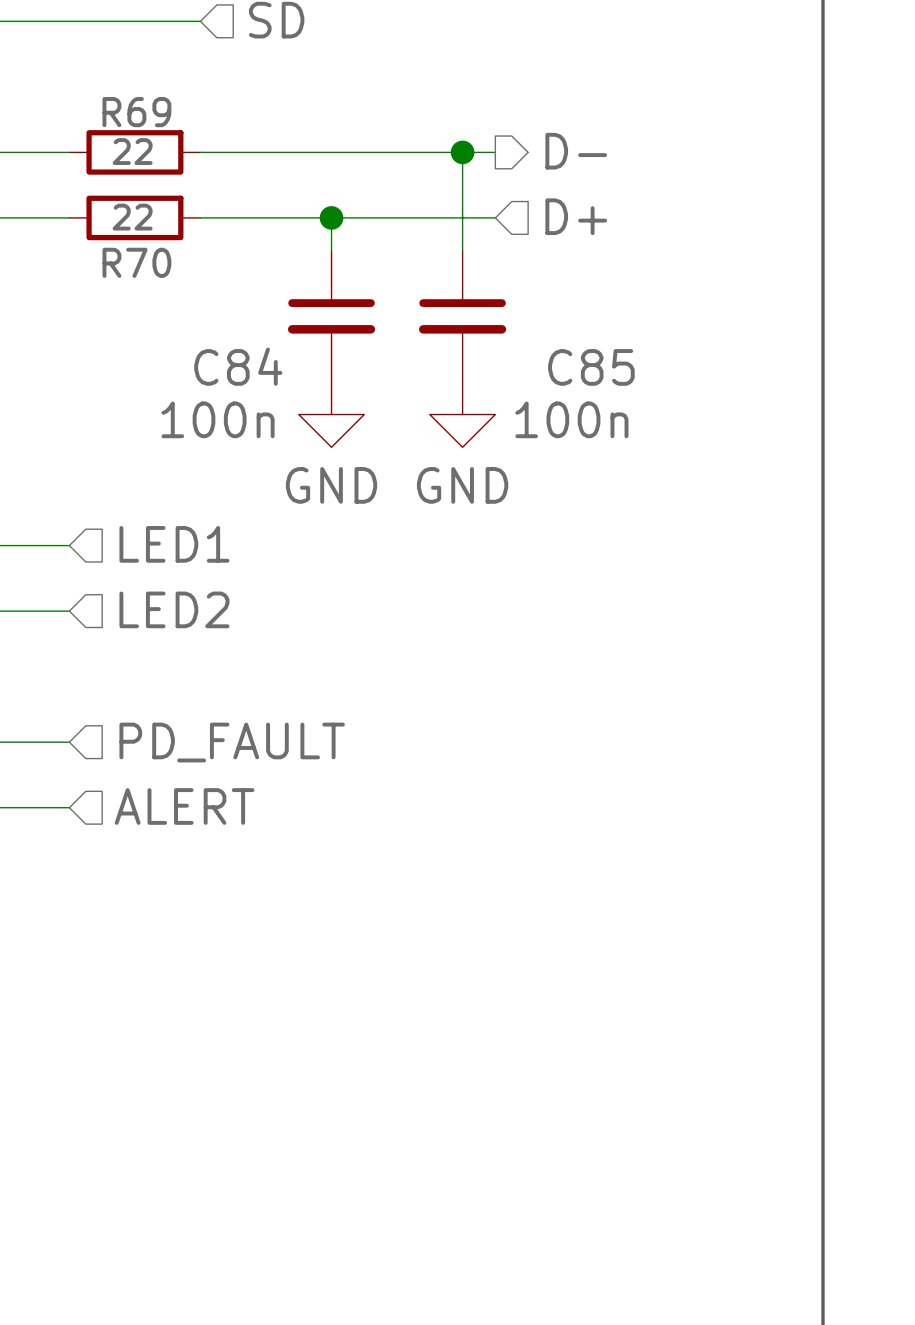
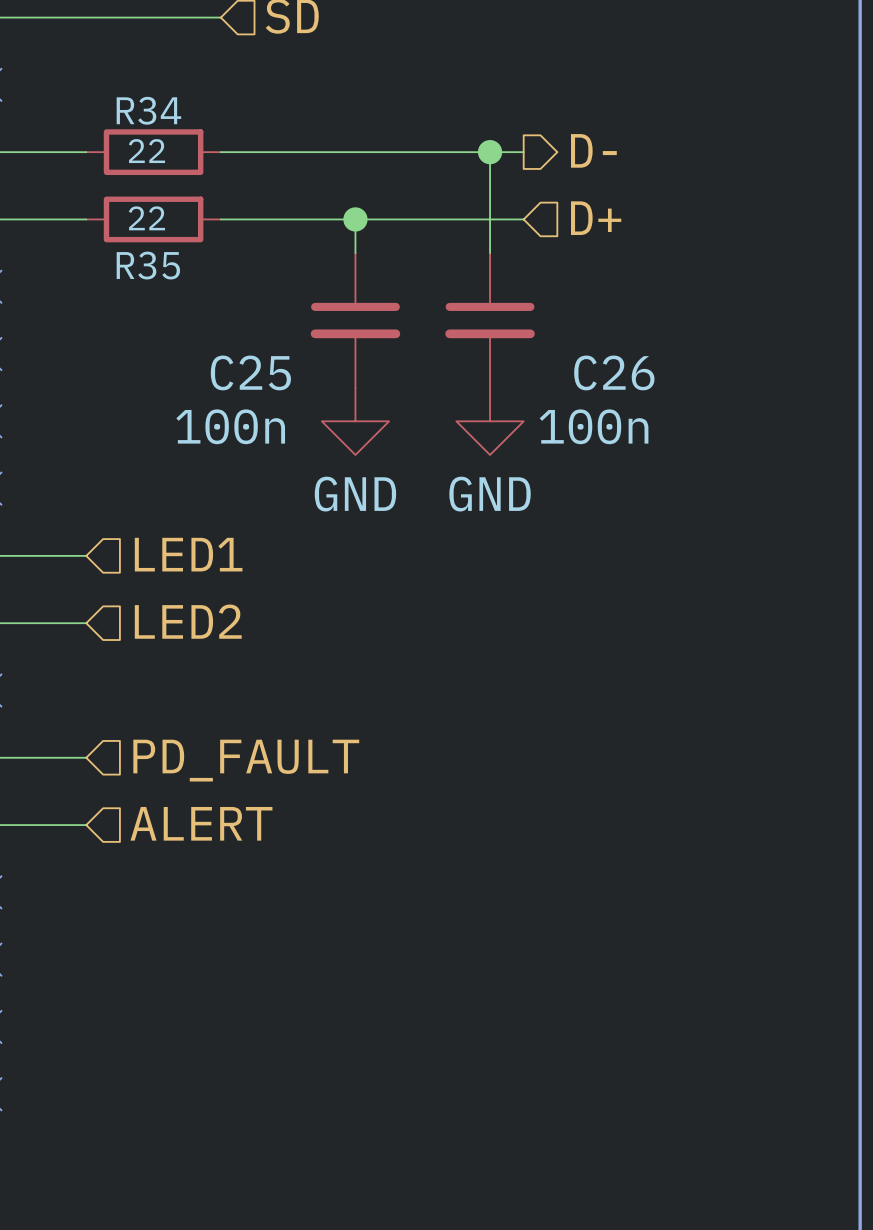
R69 name: R69 (136, 112) -> R34 (148, 110)
R70 name: R70 (136, 262) -> R35 (148, 265)
C84 name: C84 (238, 366) -> C25 (250, 372)
C85 name: C85 (591, 367) -> C26 (614, 372)

